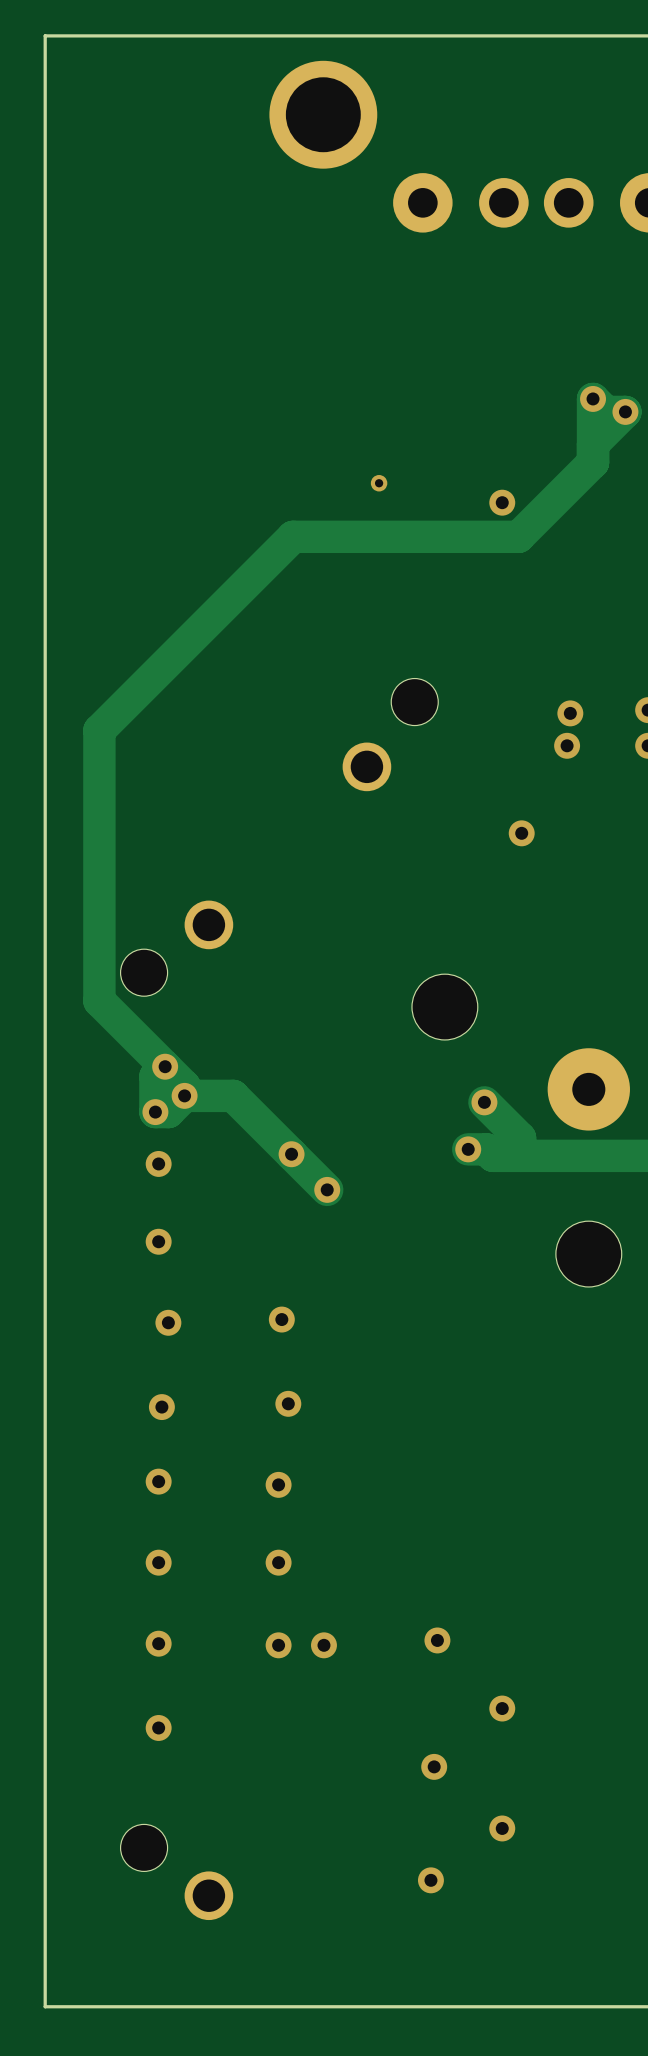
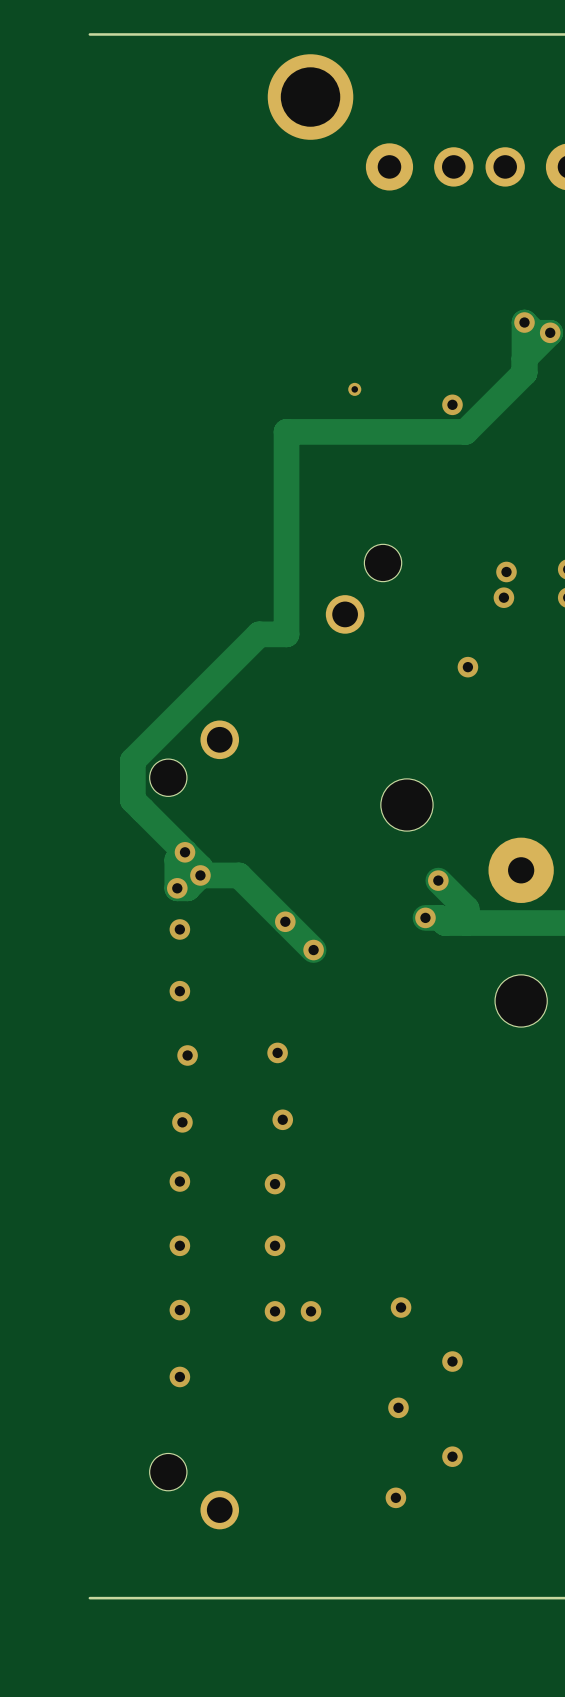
board edge: (45, 35) (45, 2006) -> none
track: (293, 536) (99, 730) (99, 951) -> (286, 431) (286, 634) (259, 634) (132, 760)

